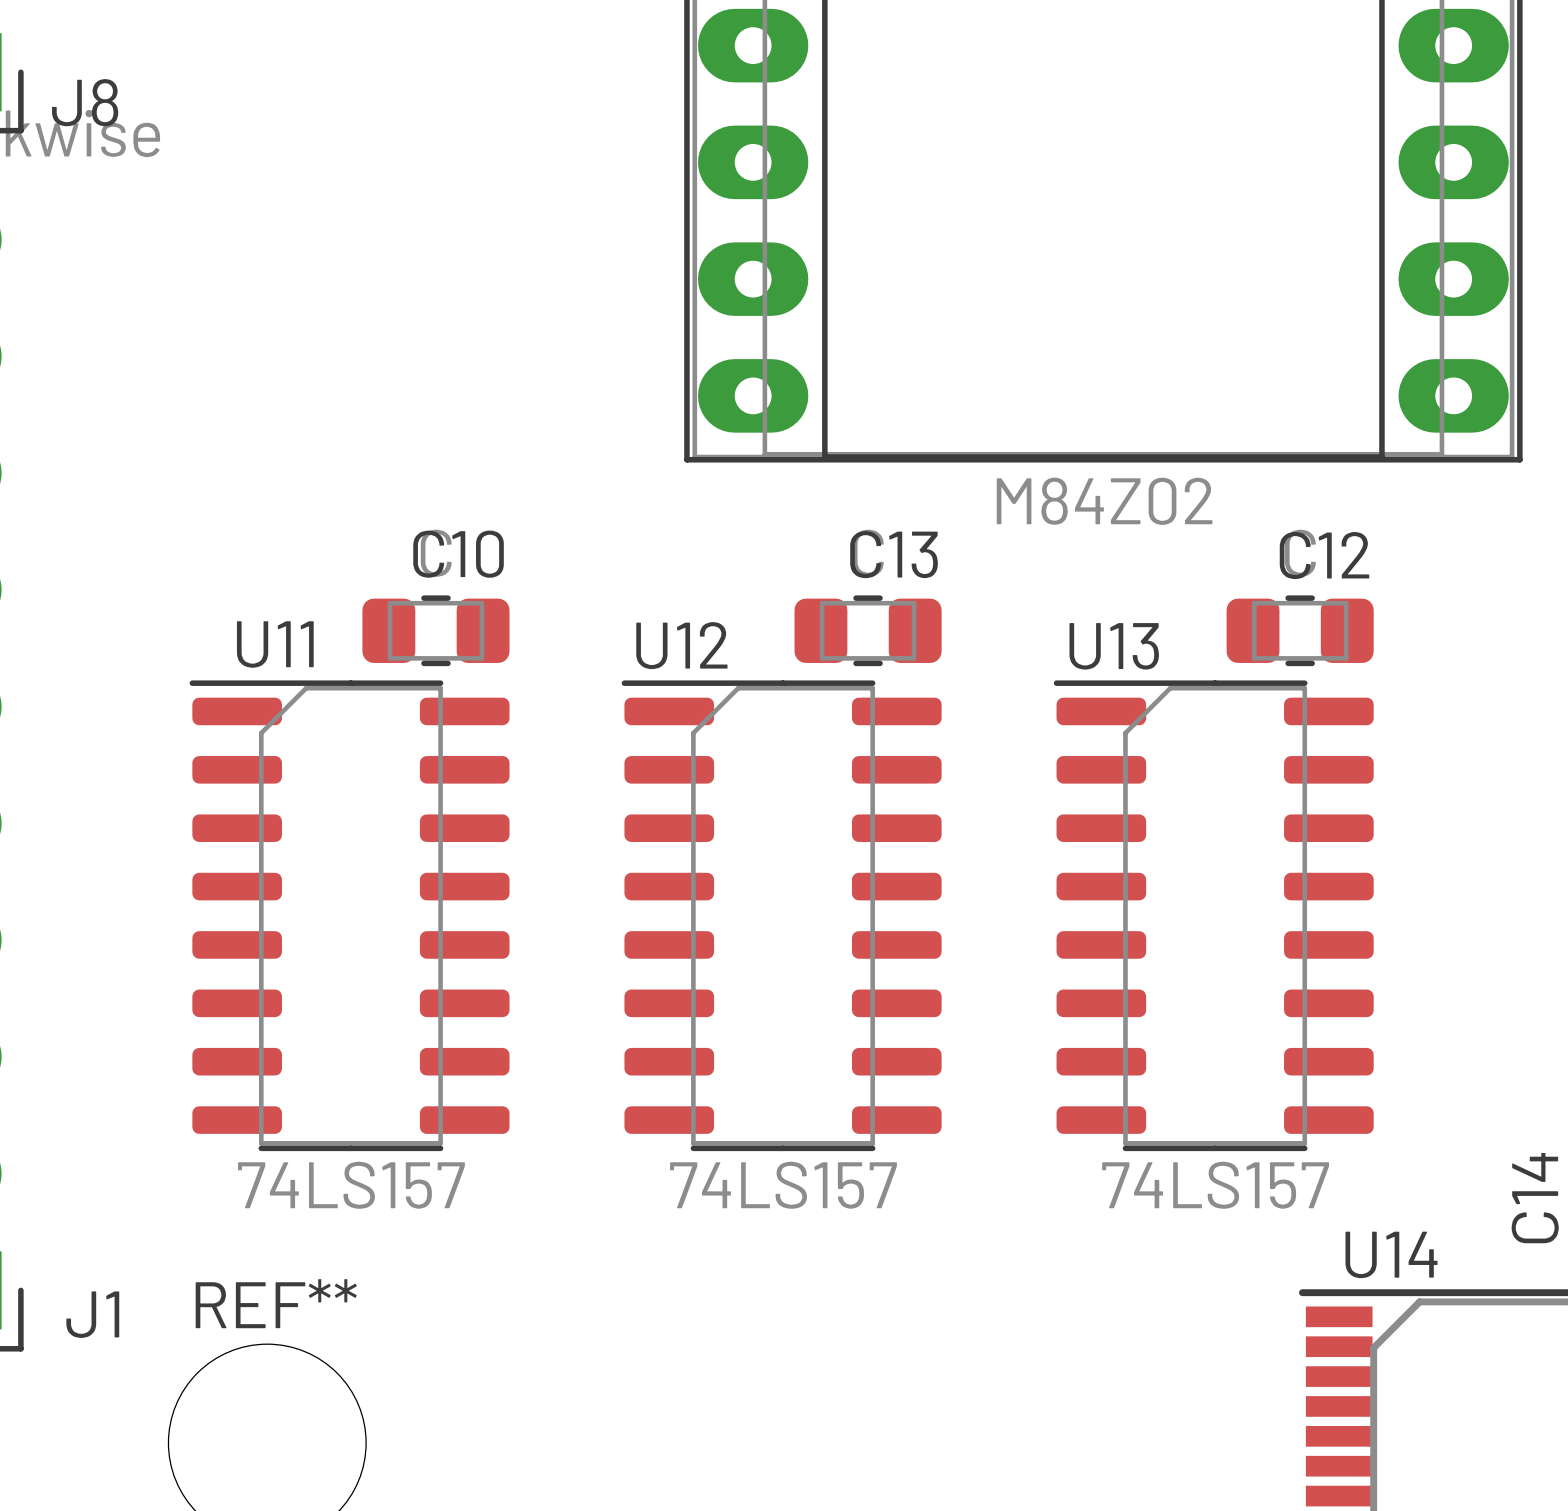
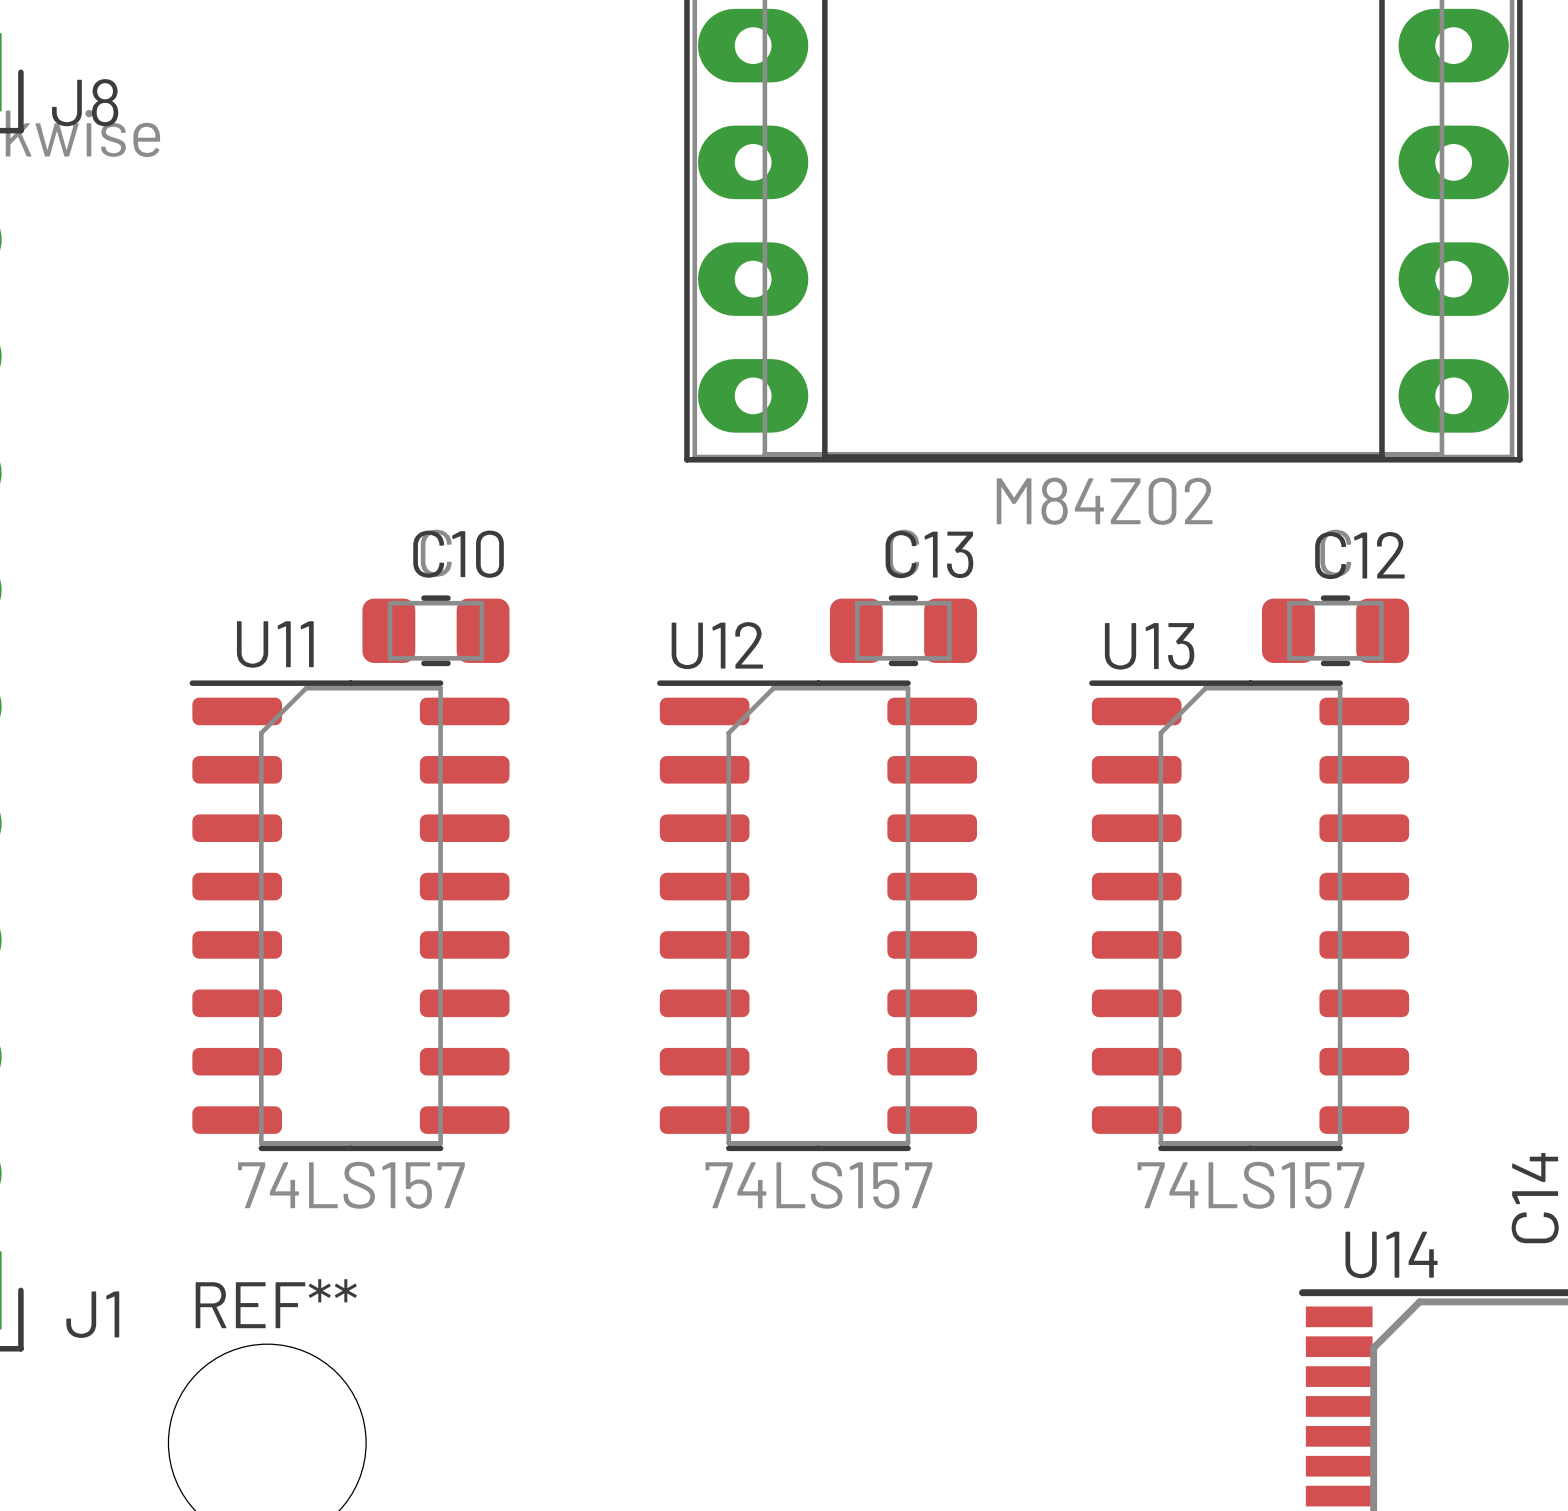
C13 position: (868, 630) -> (903, 630)
C12 position: (1300, 630) -> (1335, 630)
U12 position: (781, 915) -> (817, 915)
U13 position: (1213, 915) -> (1249, 915)

